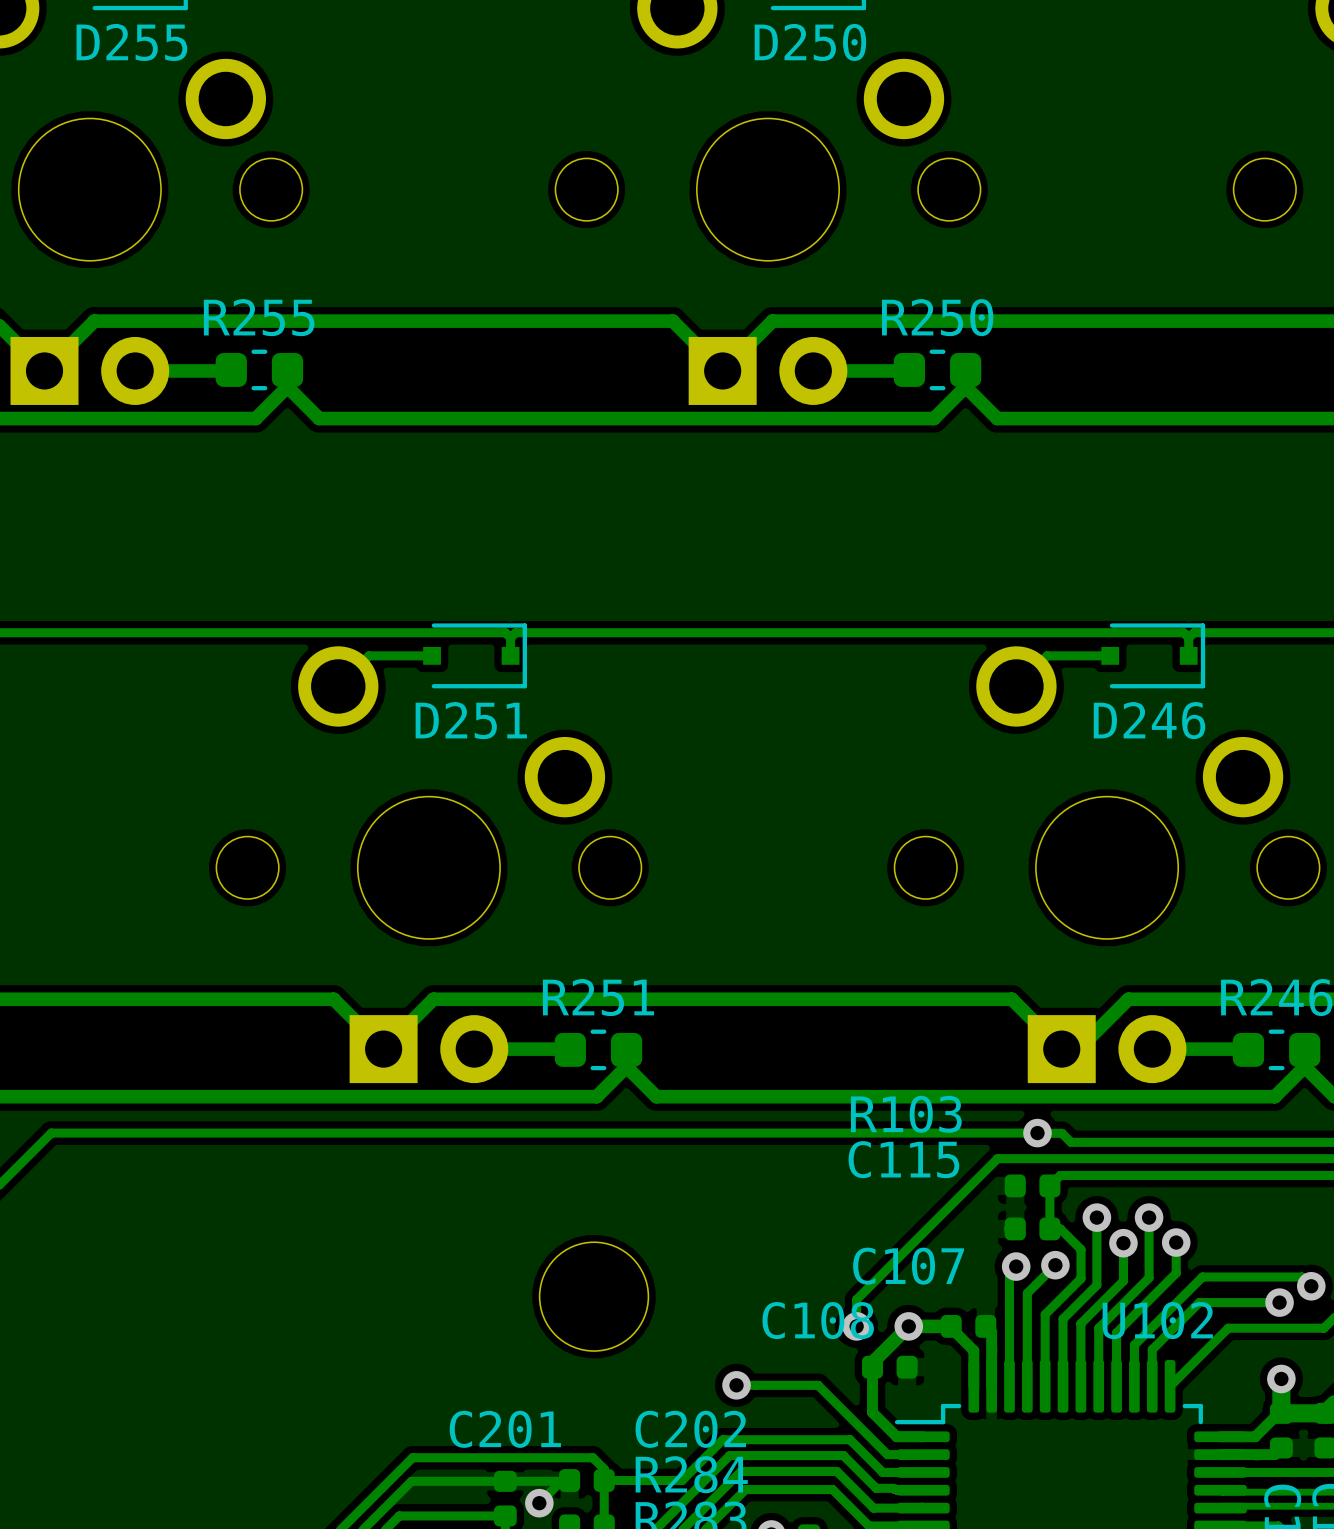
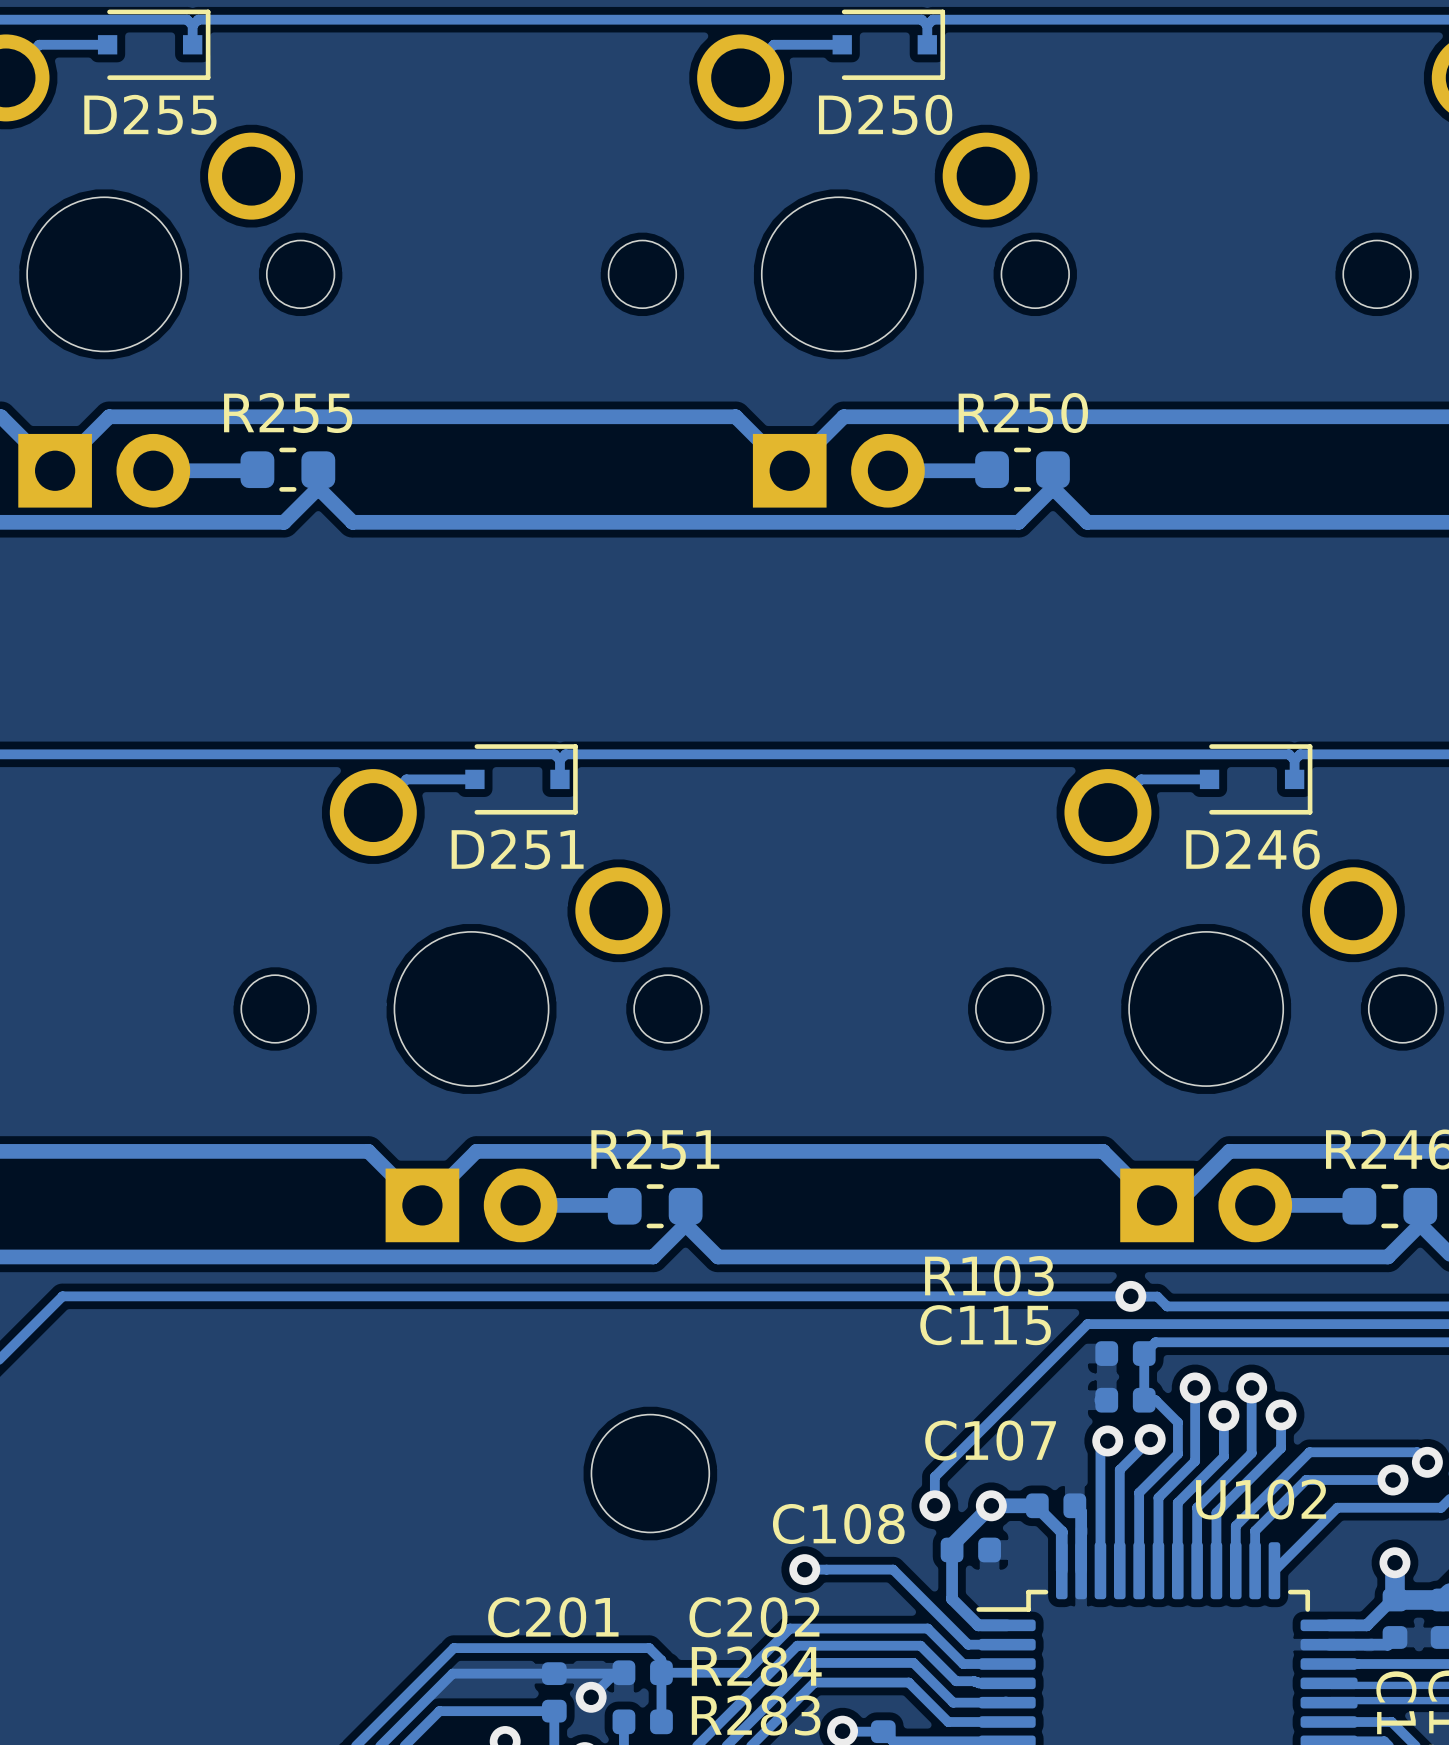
C108 name position: C108 (818, 1320) -> C108 (838, 1524)

